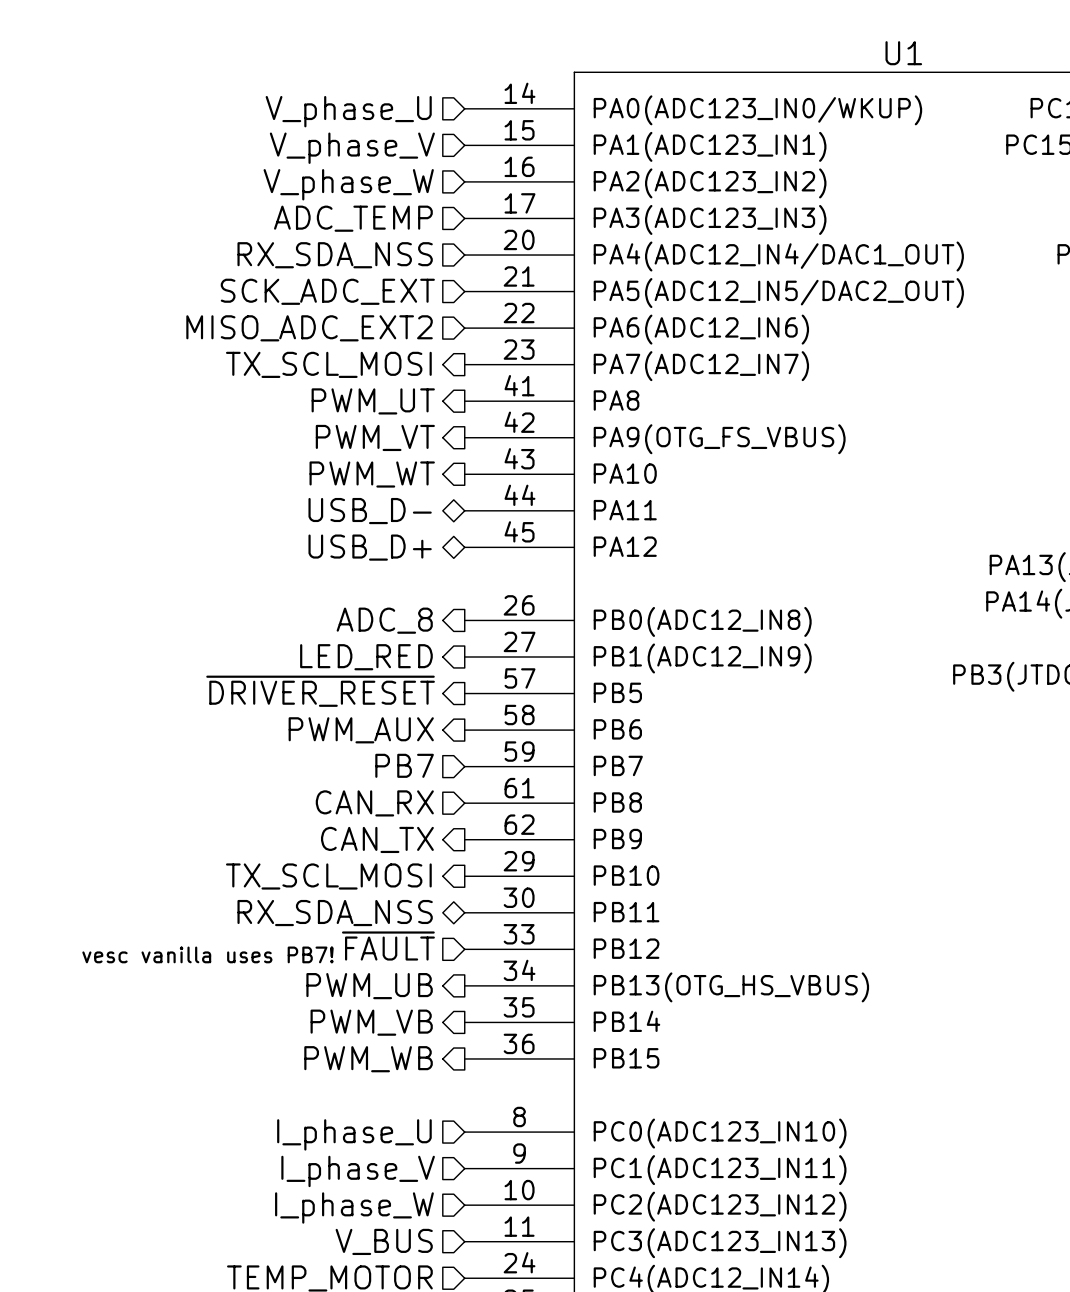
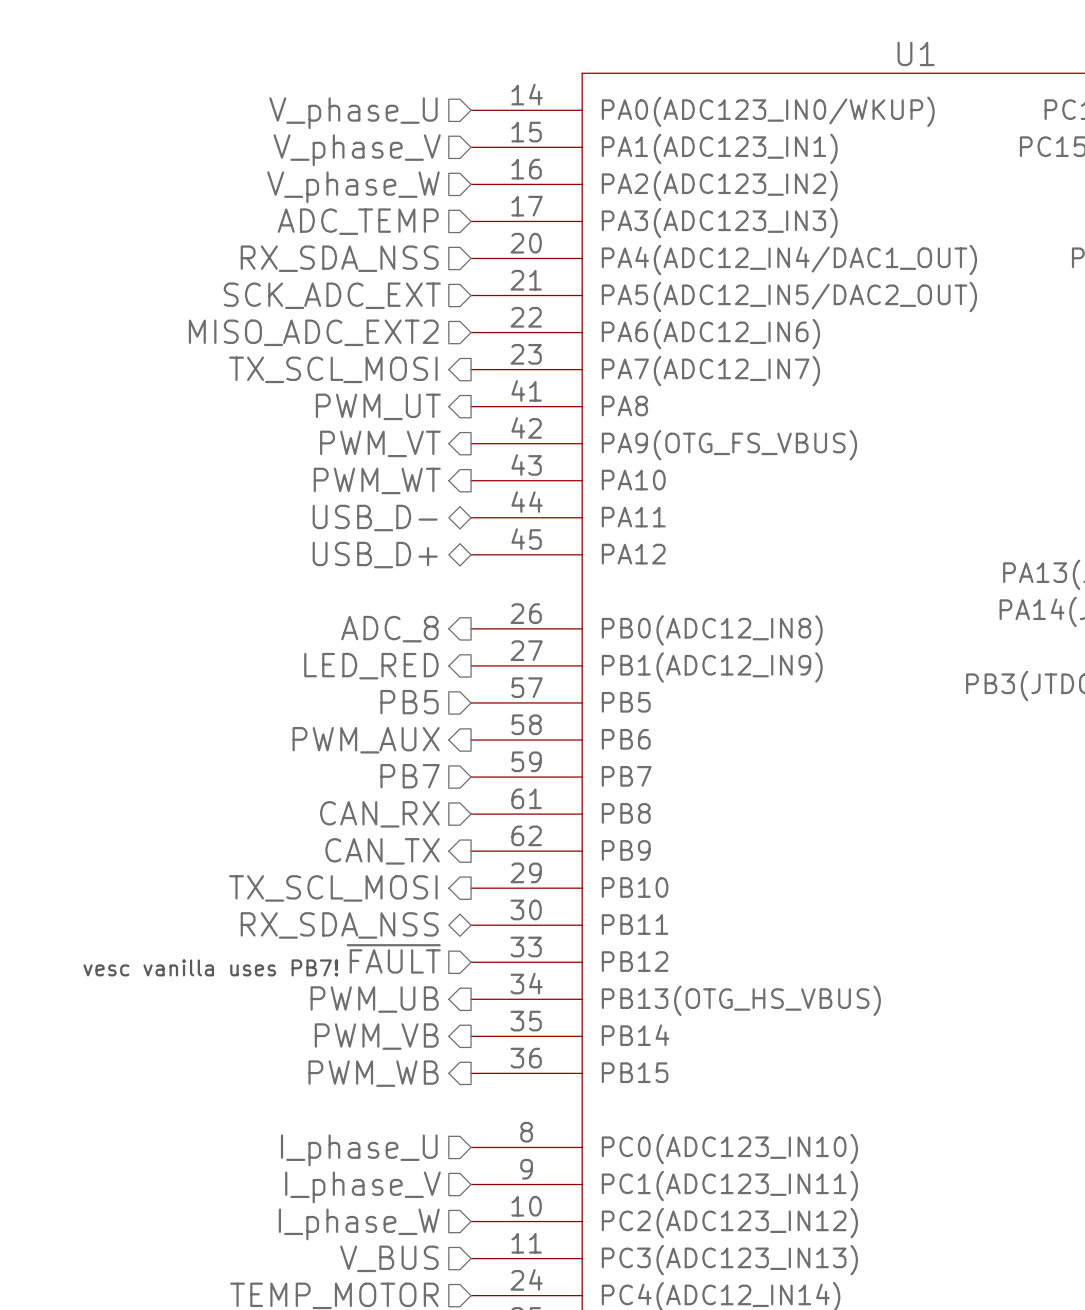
hierarchical label shape: output (320, 691) -> input (409, 702)
hierarchical label: ~{DRIVER_RESET} (320, 691) -> PB5 (409, 702)

